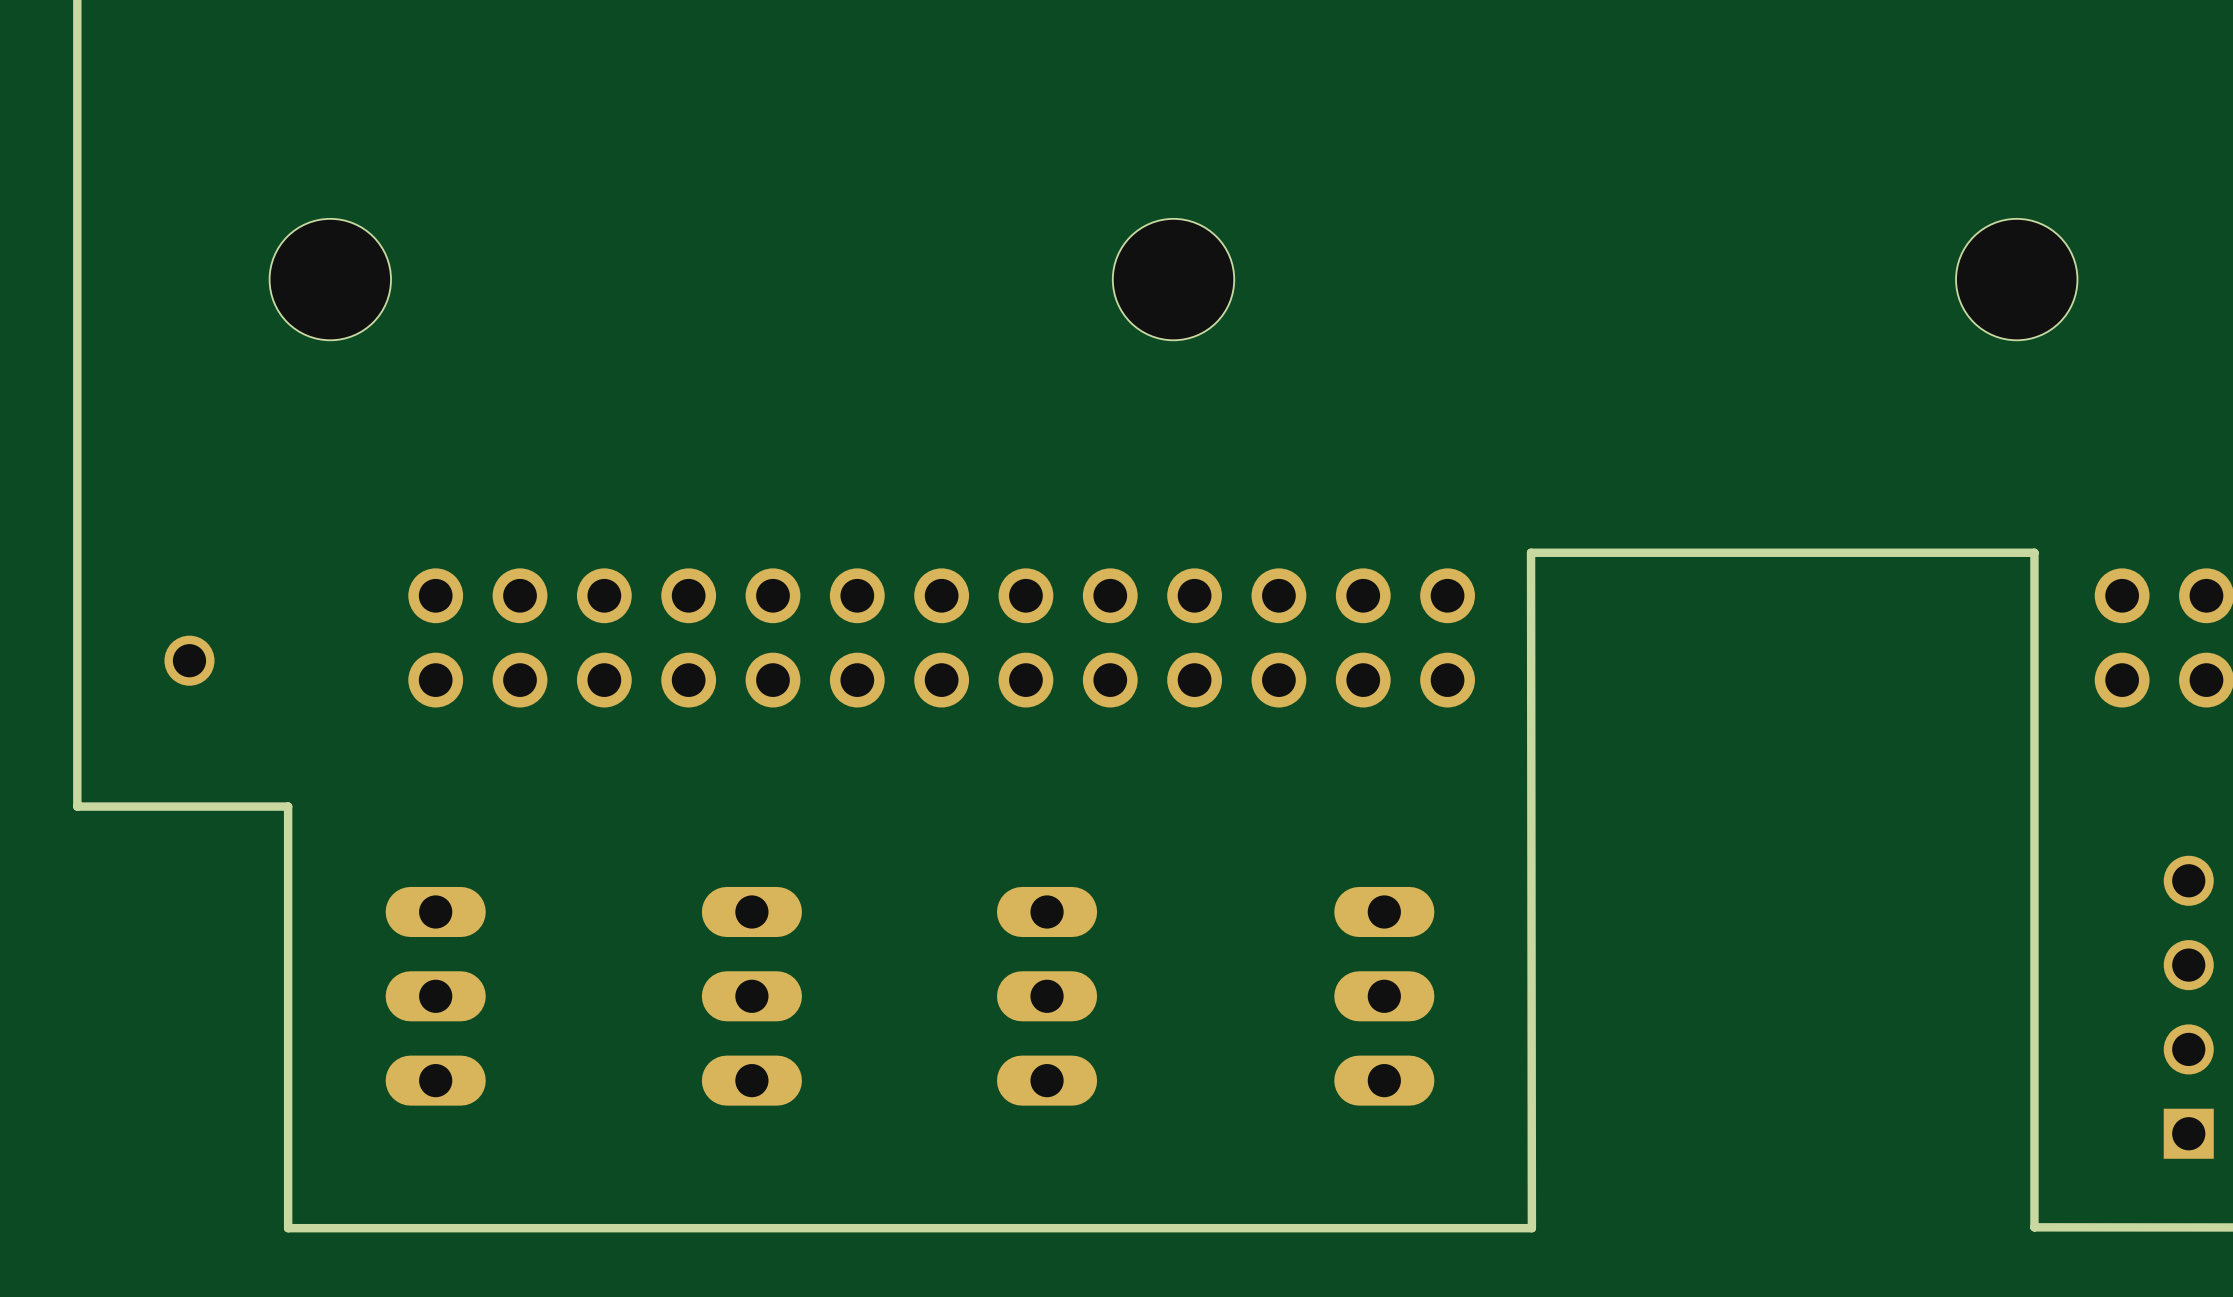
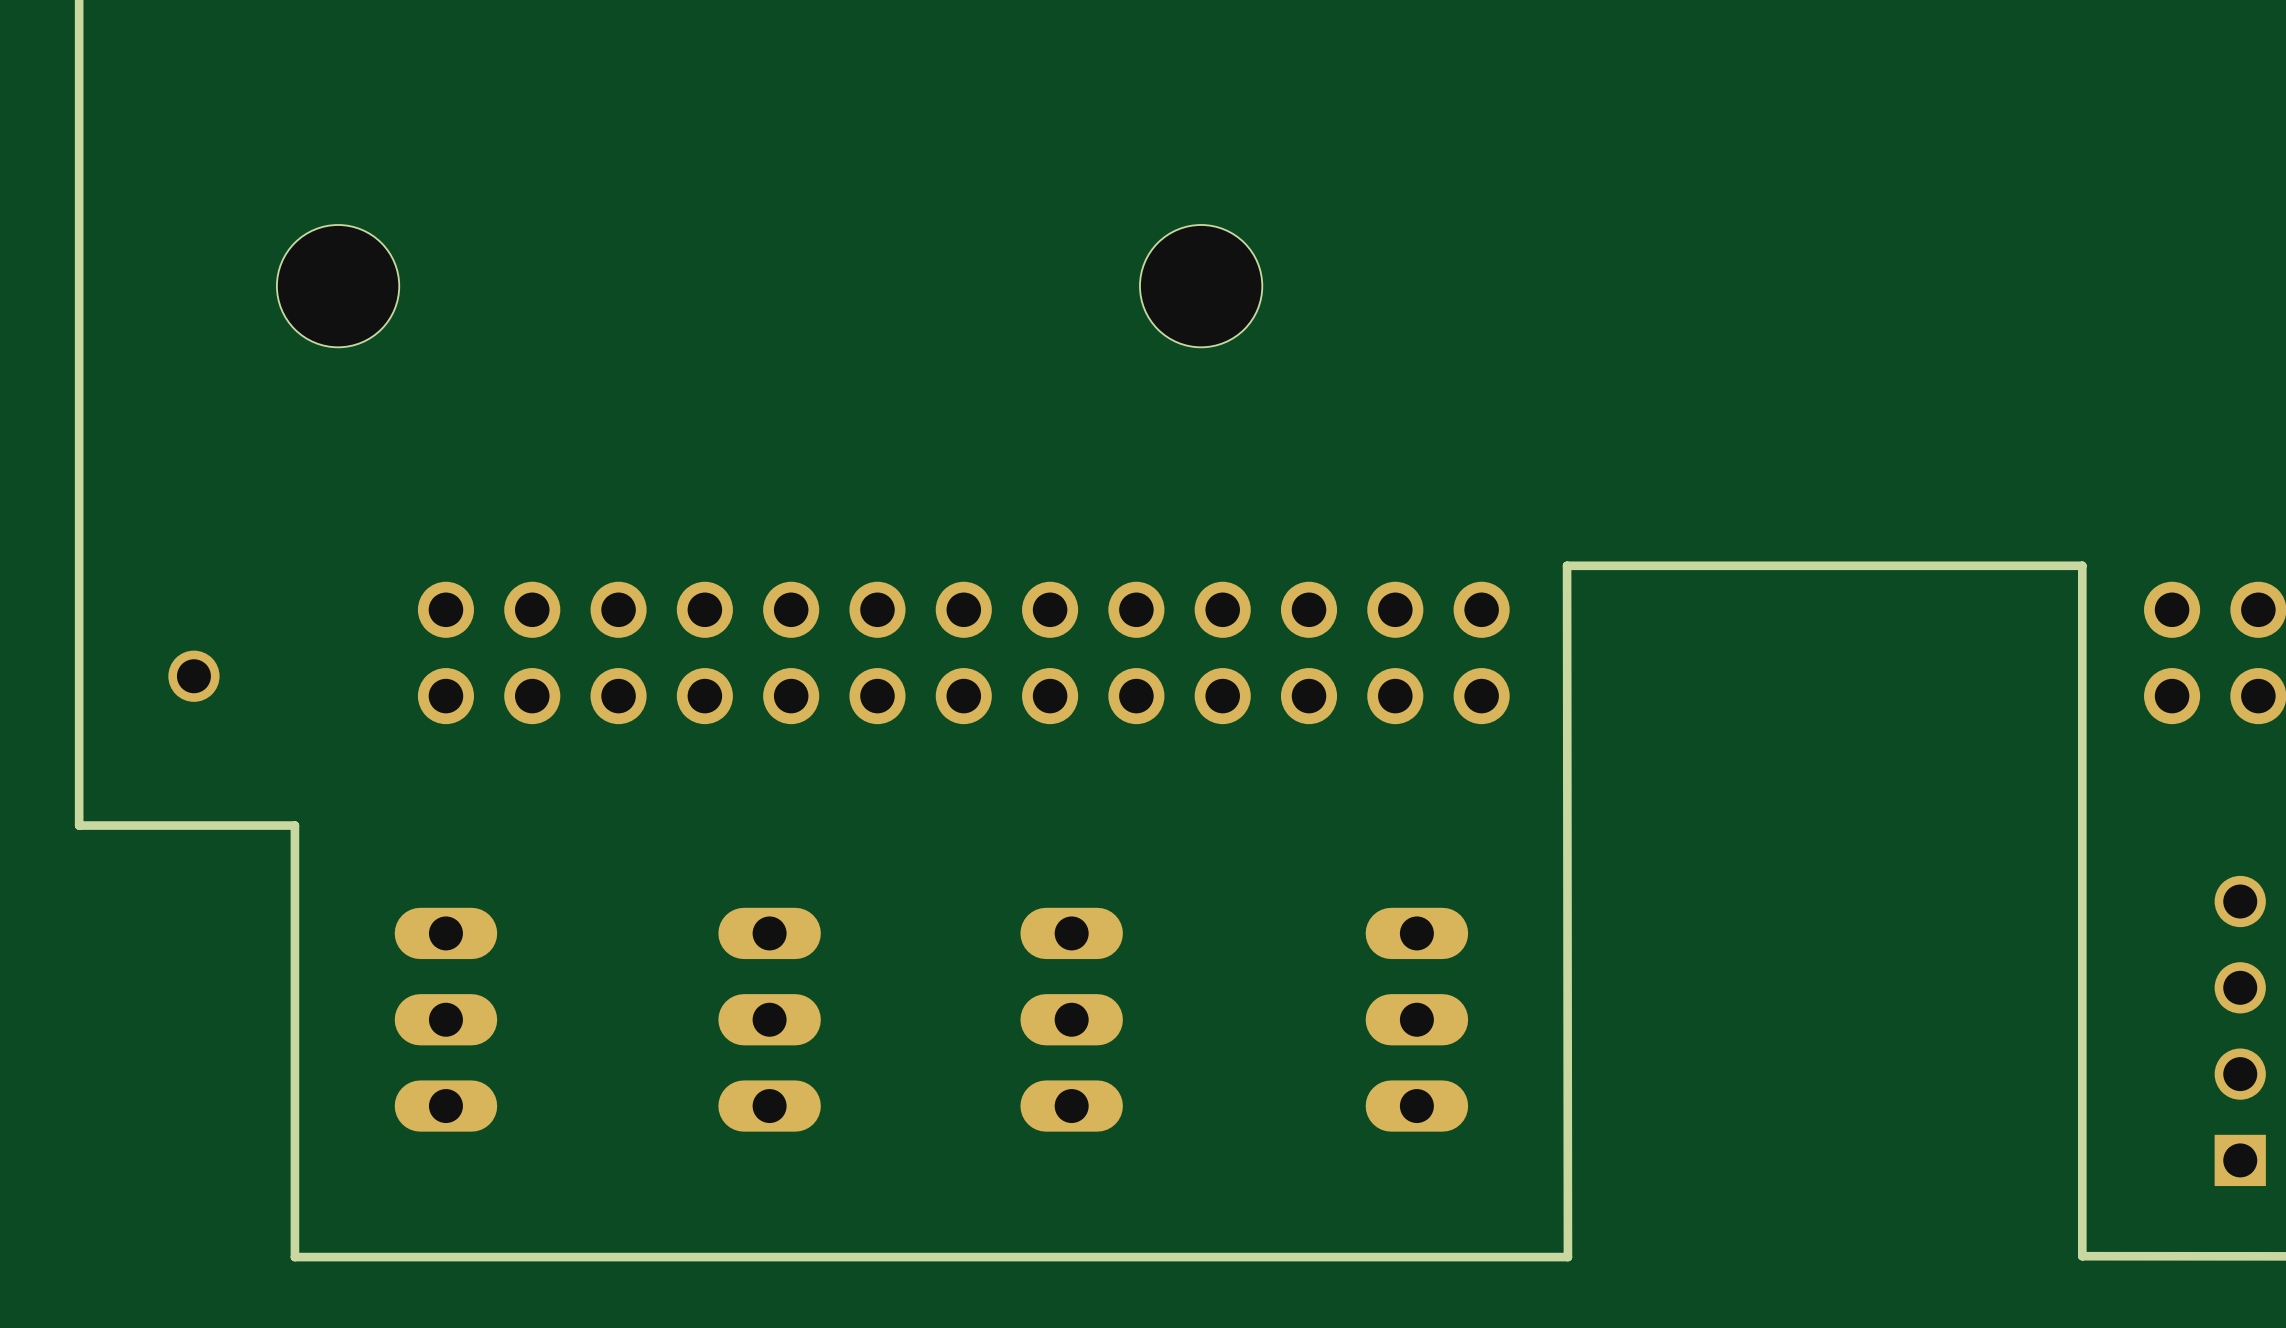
hole: (330, 279) -> none
part: none -> (338, 286)
hole: (1173, 279) -> none
part: none -> (1201, 286)
hole: (2016, 279) -> none

